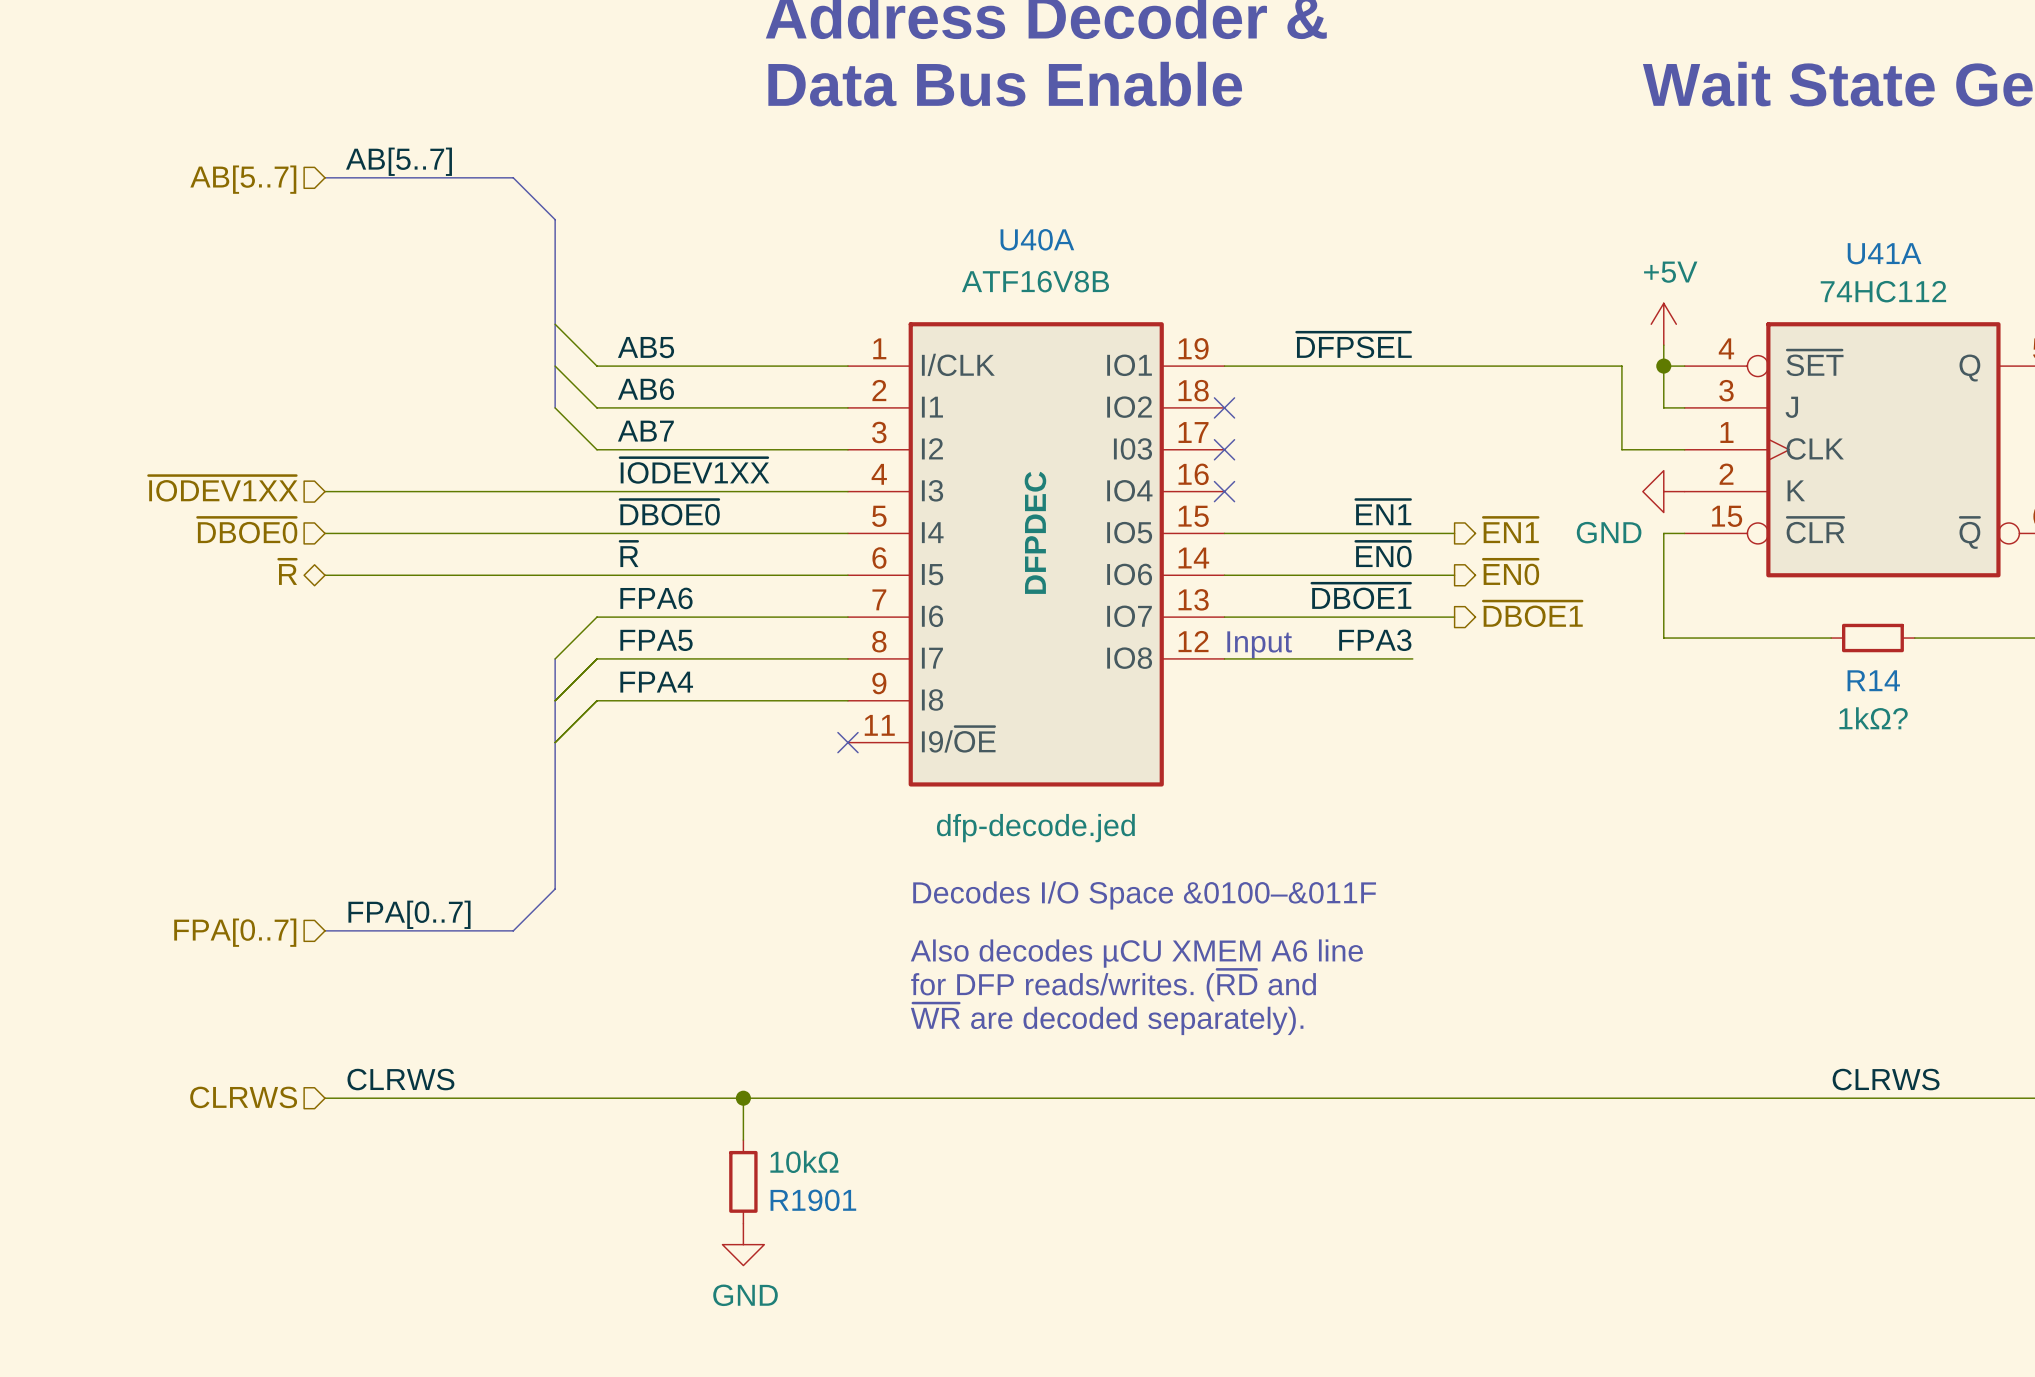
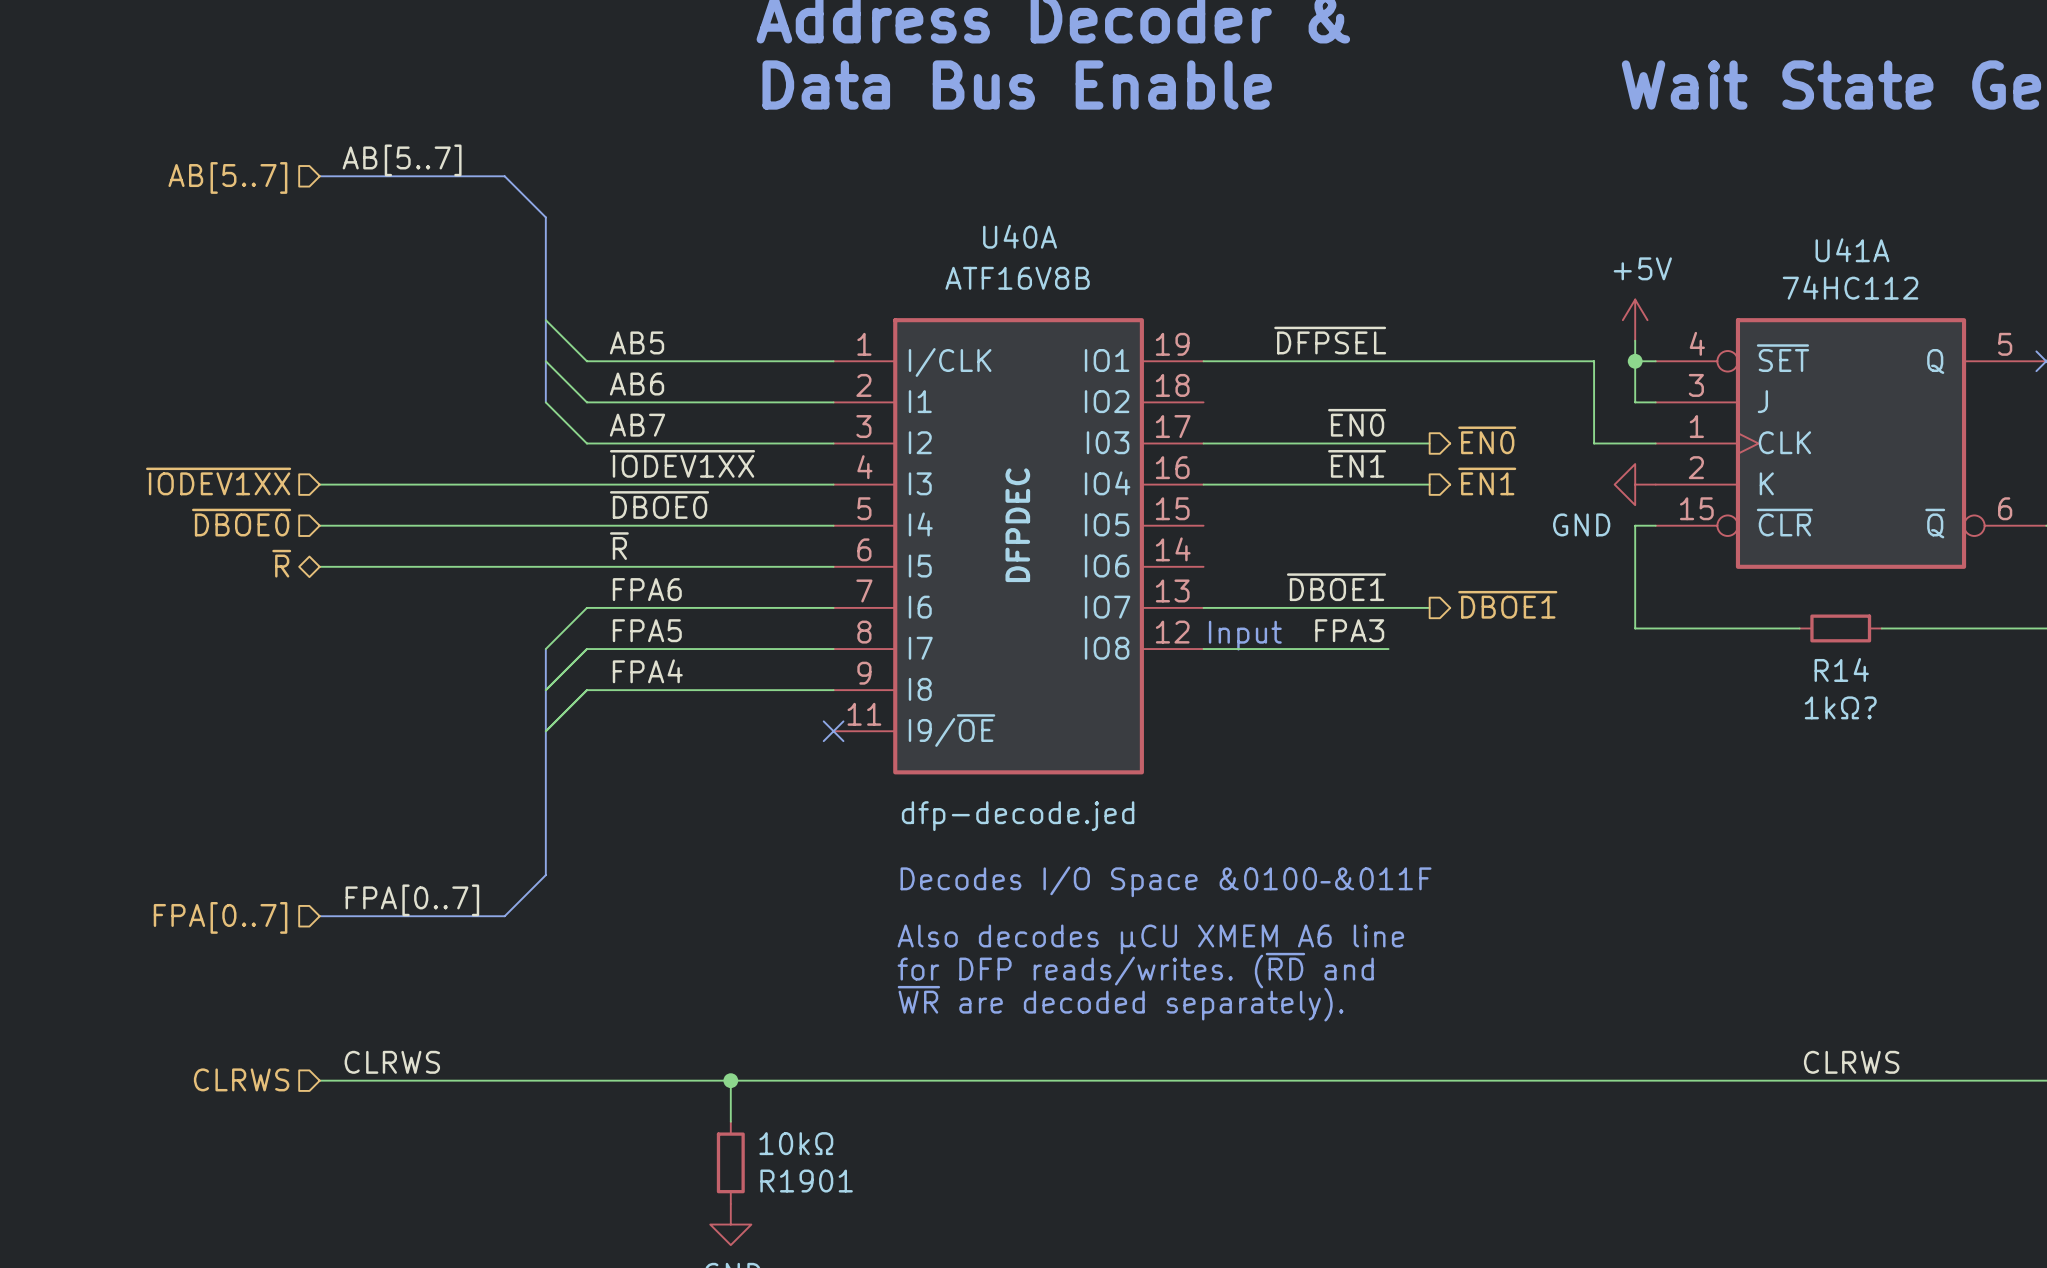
no-connect mark: (1224, 407) -> none
no-connect mark: (1224, 449) -> none
no-connect mark: (1224, 491) -> none
label position: ~{EN1} (1383, 512) -> ~{EN1} (1357, 463)
hierarchical label position: ~{EN1} (1511, 530) -> ~{EN1} (1487, 481)
wire: (1224, 533) (1454, 533) -> (1203, 443) (1429, 443)
label position: ~{EN0} (1383, 554) -> ~{EN0} (1357, 422)
hierarchical label position: ~{EN0} (1511, 572) -> ~{EN0} (1487, 440)
wire: (1224, 575) (1454, 575) -> (1203, 484) (1429, 484)

